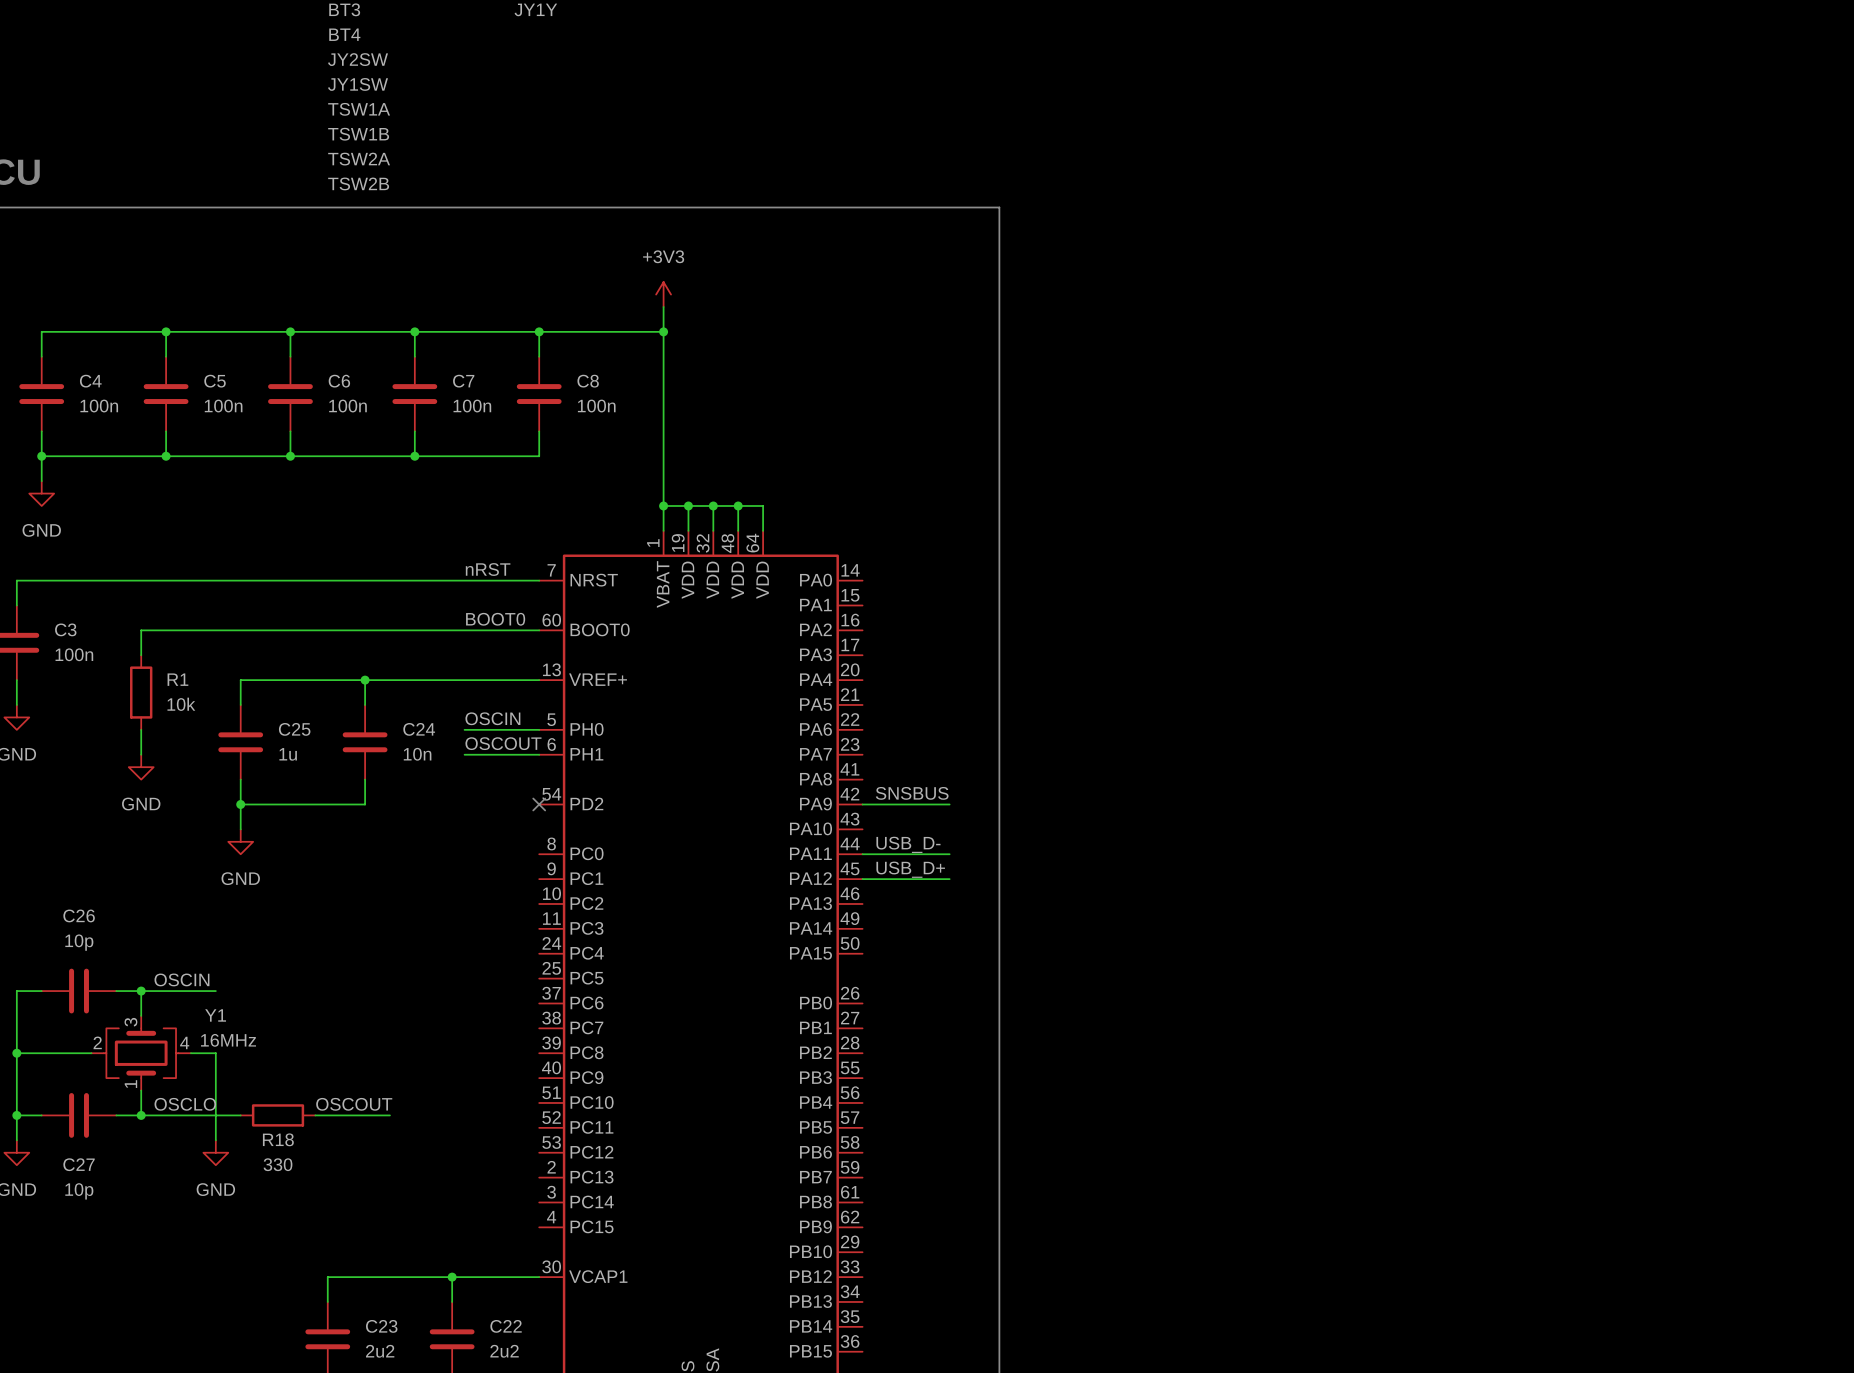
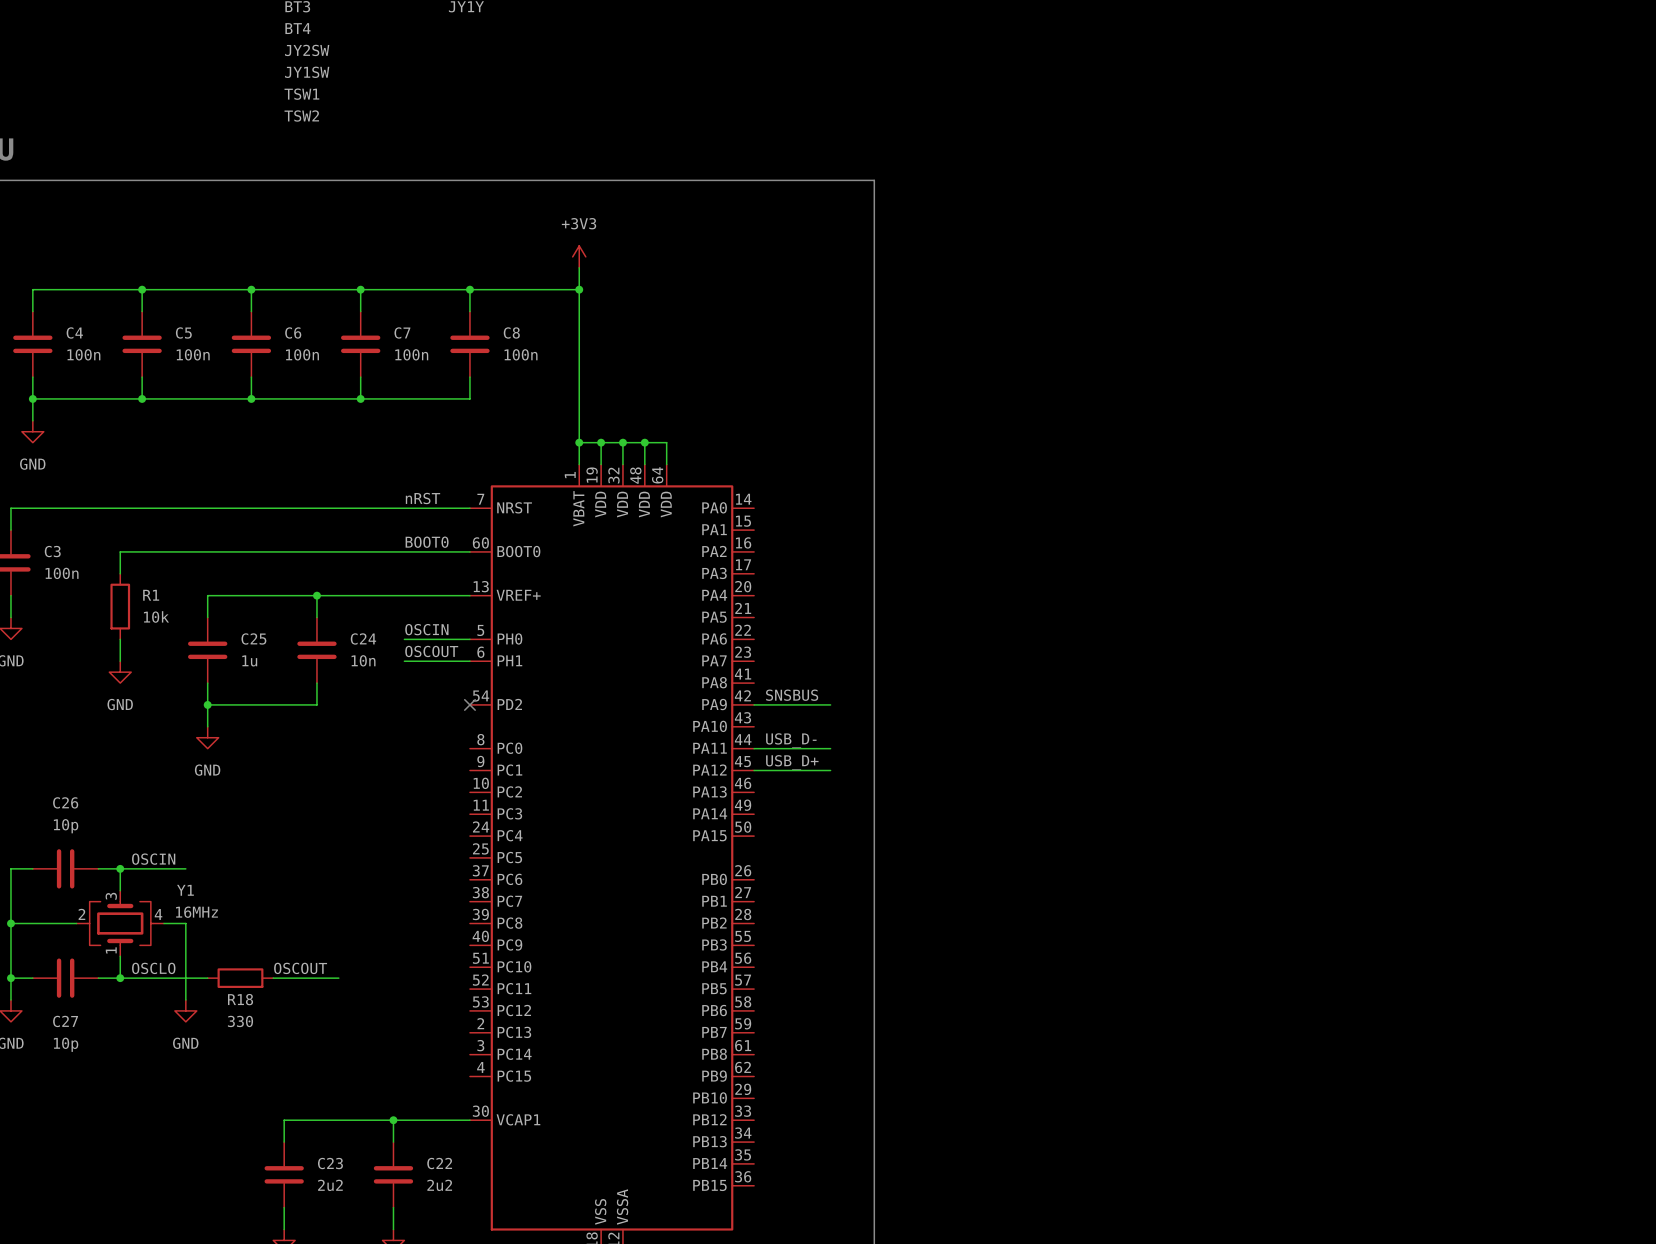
label: TSW1A (359, 109) -> TSW1 (301, 94)
label: TSW1B (358, 134) -> TSW2 (301, 116)
label: TSW2A (359, 159) -> none
label: TSW2B (358, 183) -> none

